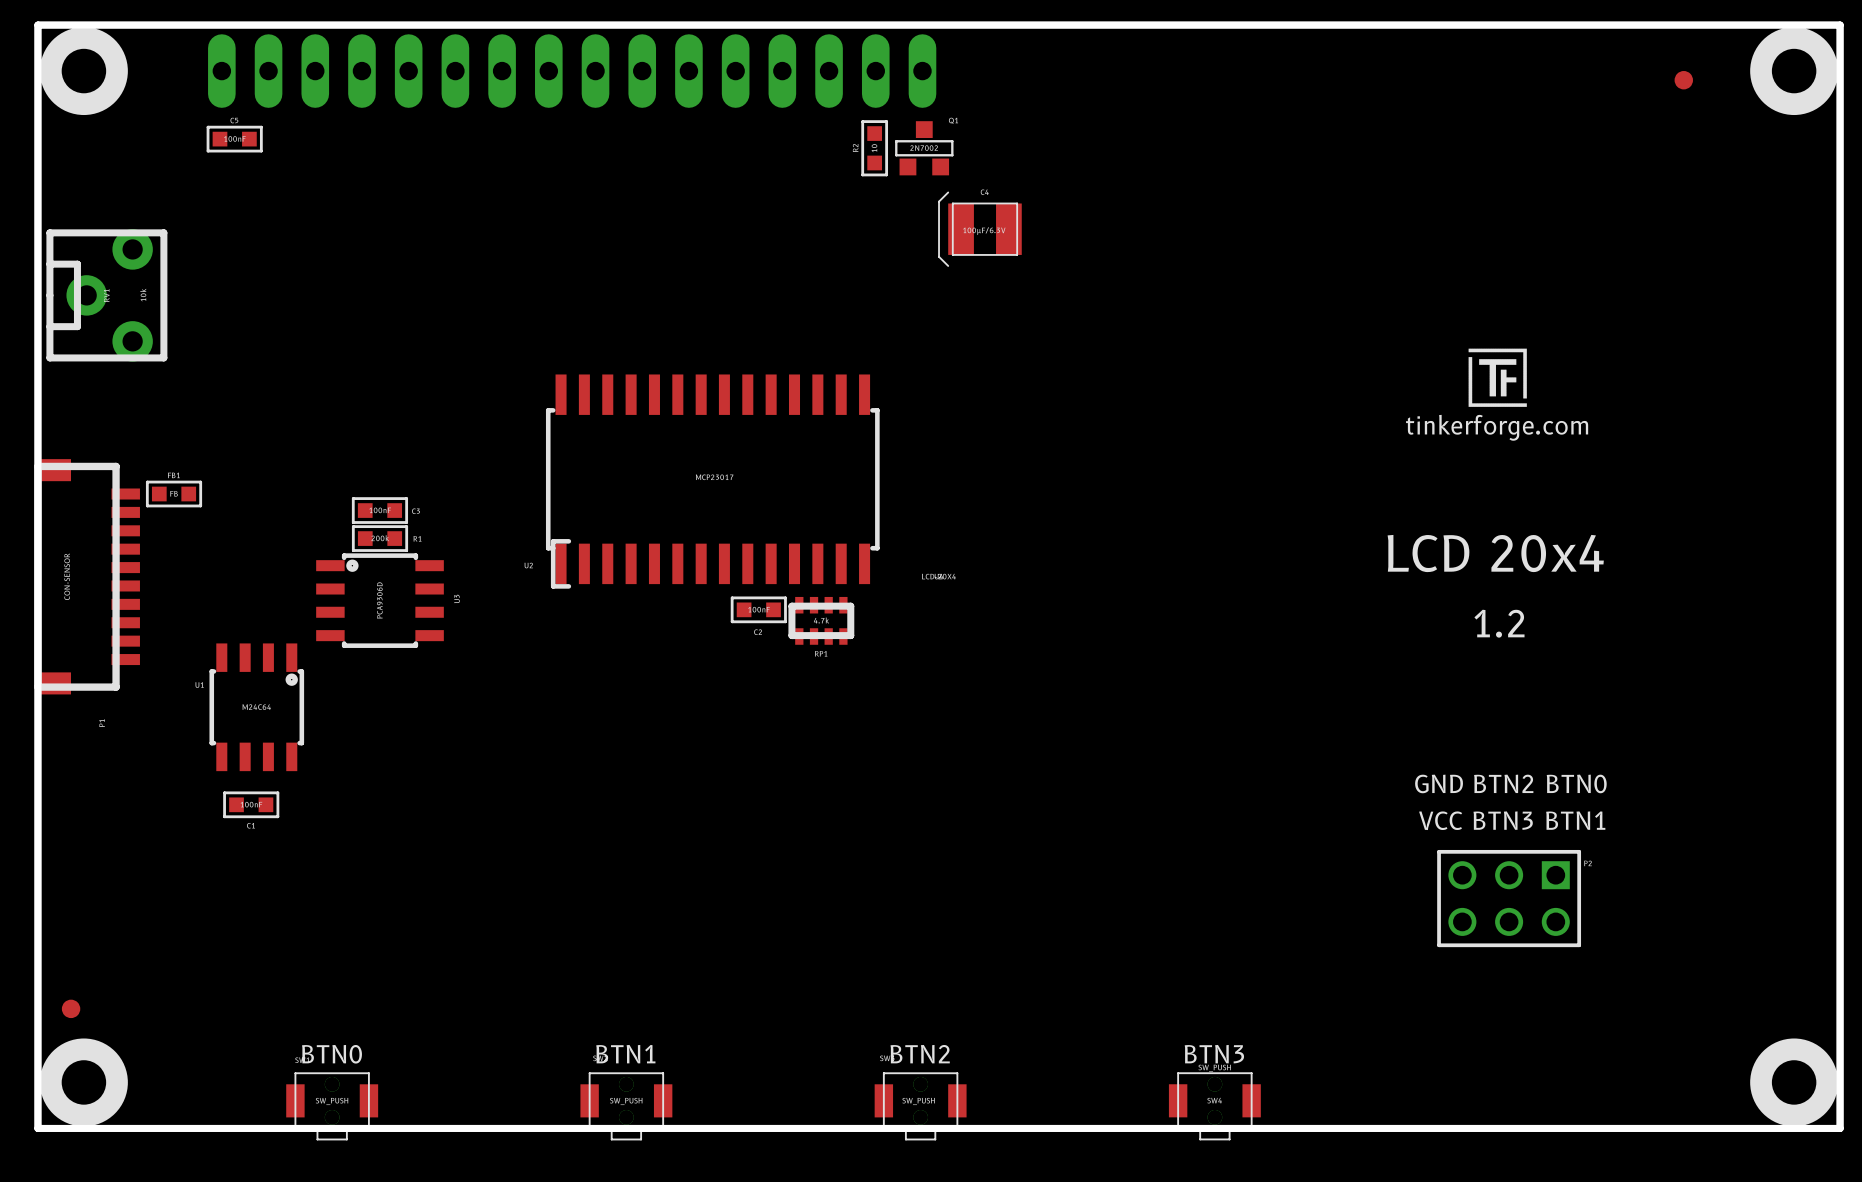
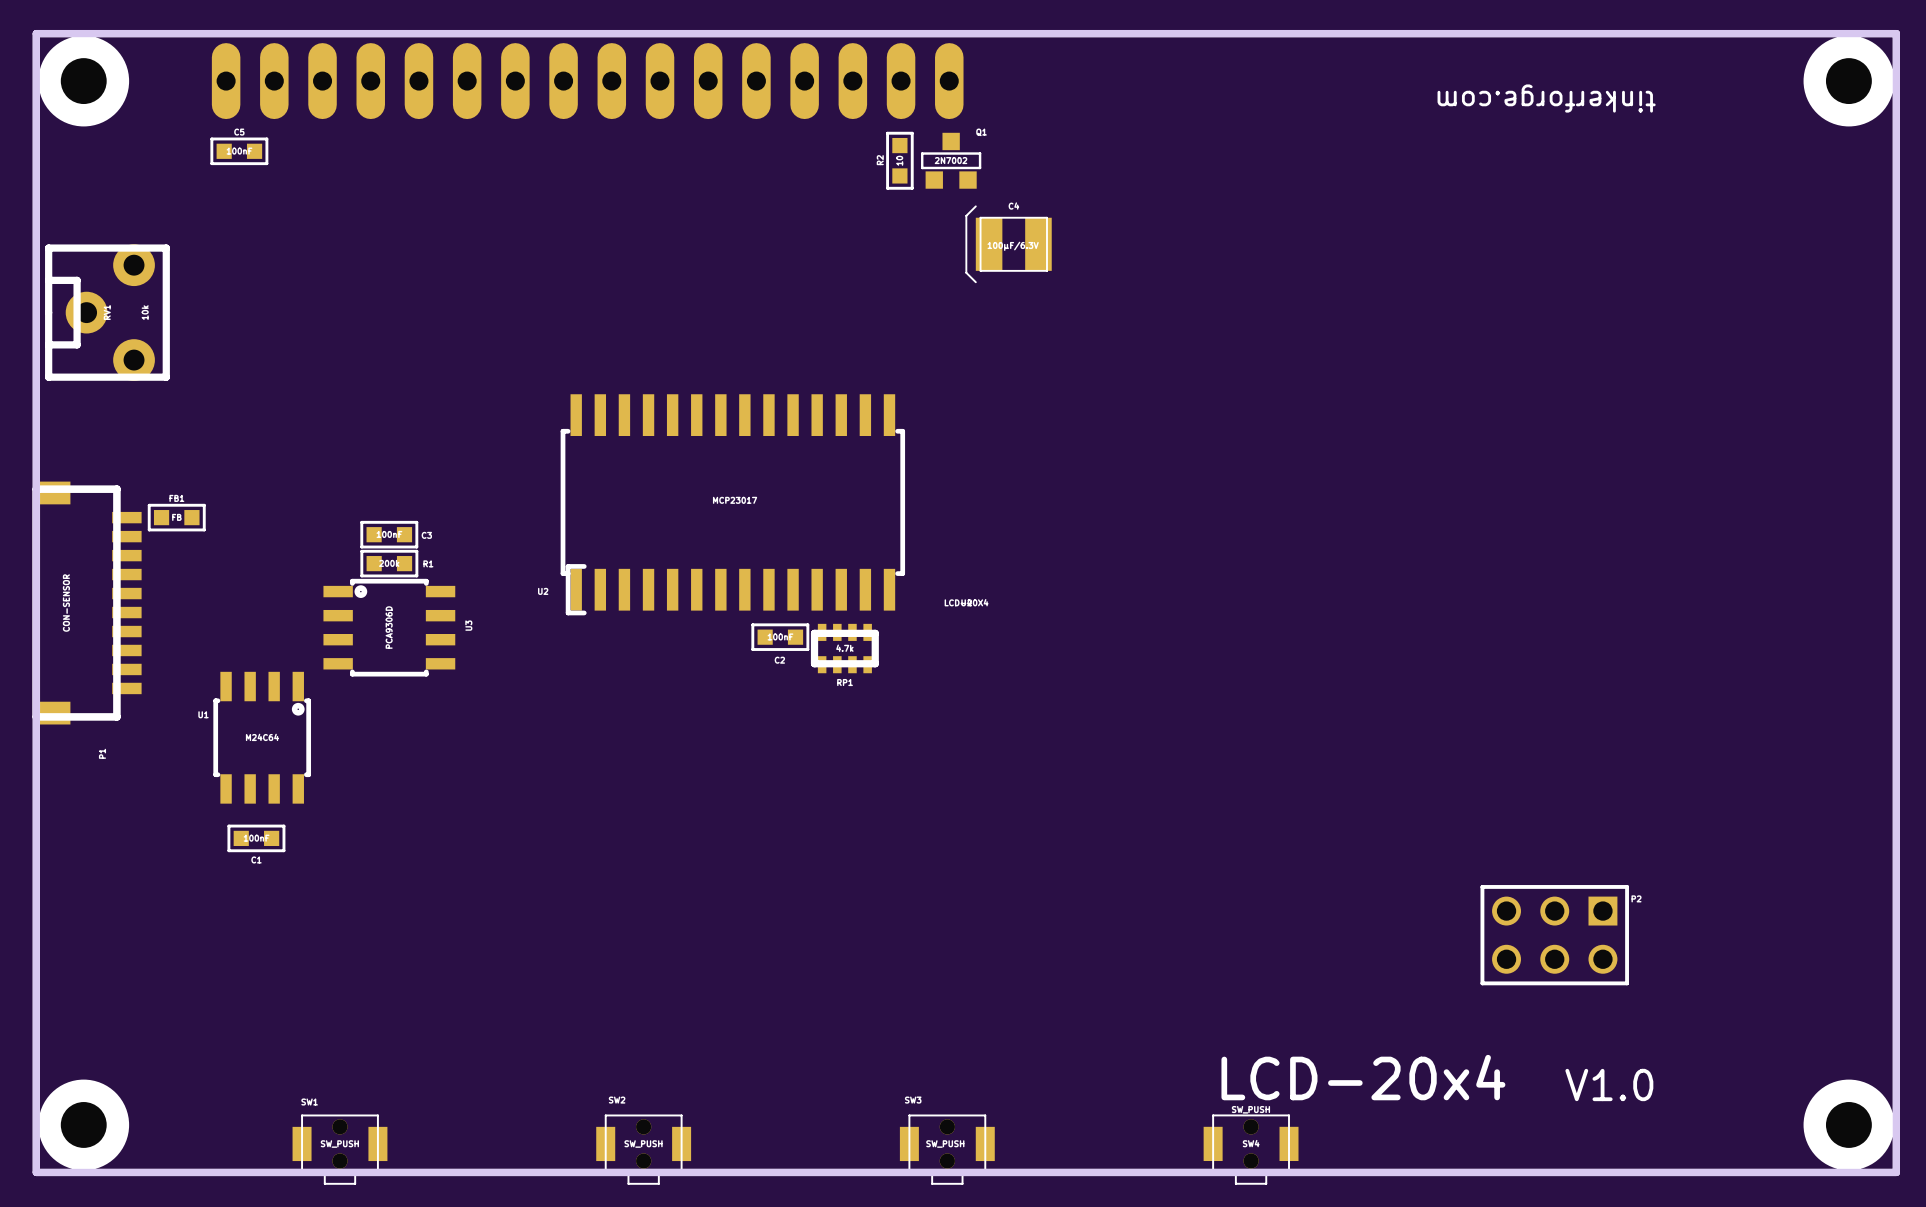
part: (1683, 80) -> none
drawing: [1468, 348, 1527, 407] -> none
text rotation: 0° (1497, 427) -> 180° (1546, 98)
text position: tinkerforge.com (1497, 427) -> tinkerforge.com (1546, 98)
text: LCD 20x4 (1495, 553) -> none
text: 1.2 (1499, 623) -> none
text: GND BTN2 BTN0 (1510, 783) -> none
text: VCC BTN3 BTN1 (1512, 820) -> none
part: (71, 1008) -> none
text: none -> LCD-20x4 (1363, 1077)
text: none -> V1.0 (1609, 1084)
text: BTN0 (331, 1054) -> none
text: BTN1 (625, 1054) -> none
text: BTN2 (920, 1054) -> none
text: BTN3 (1214, 1054) -> none

